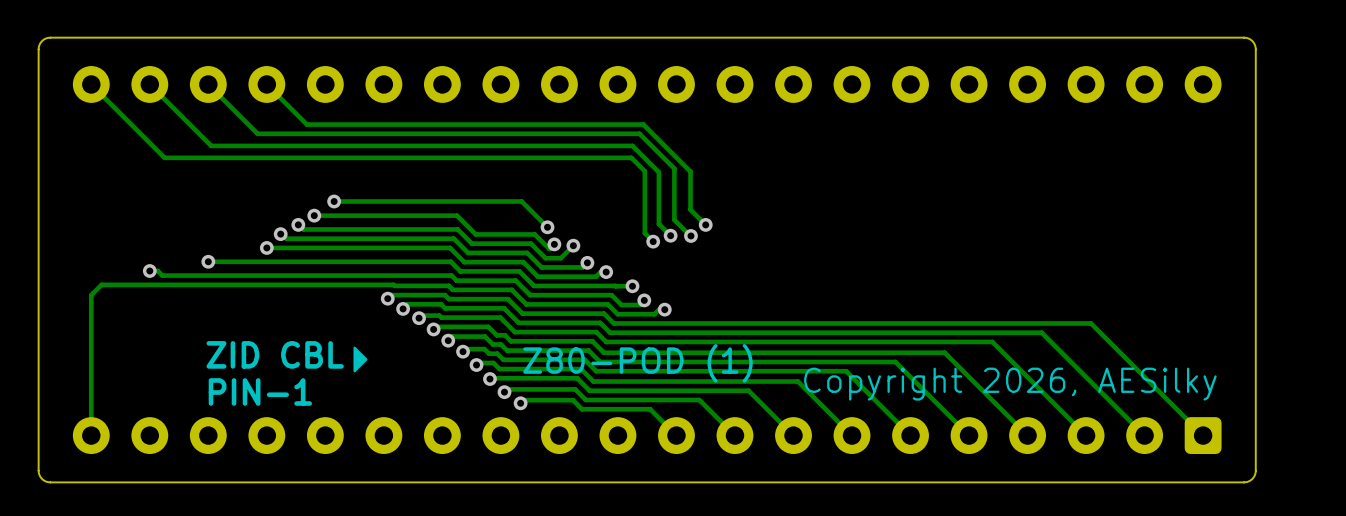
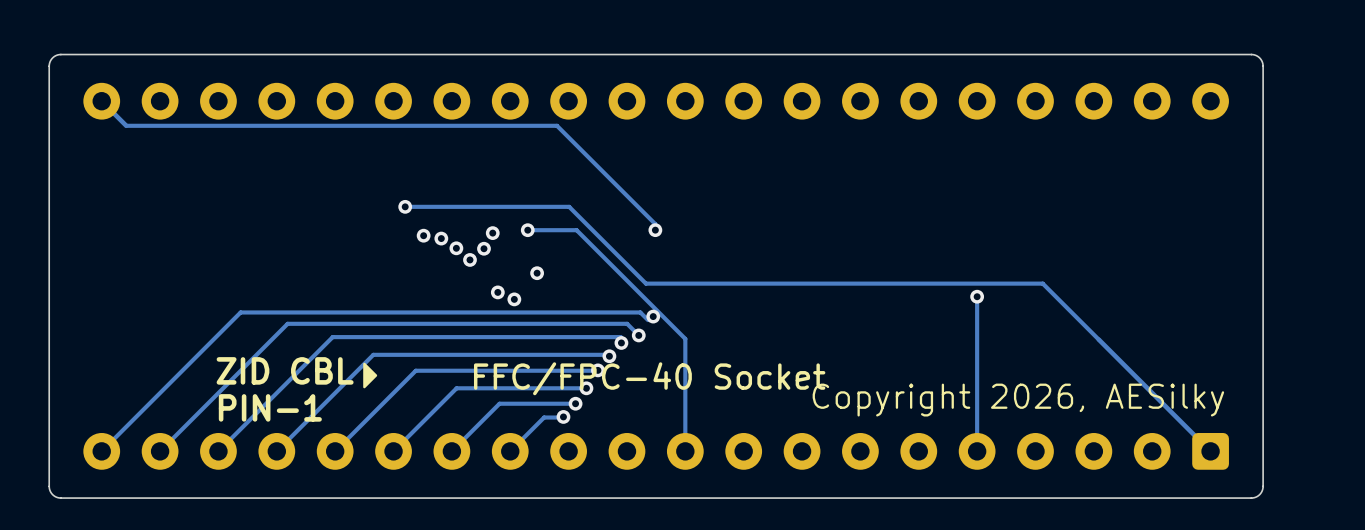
track: (149, 84) (211, 145) (632, 145) (658, 172) (658, 223) (670, 235) -> none
track: (208, 84) (257, 133) (639, 133) (674, 168) (674, 219) (690, 235) -> none
track: (266, 84) (306, 124) (643, 124) (690, 171) (690, 209) (705, 224) -> none
track: (115, 109) (164, 157) (631, 157) (644, 171) (644, 233) (653, 241) -> (126, 125) (557, 125) (655, 224) (655, 230)
via: none -> (405, 206)
track: (334, 201) (521, 201) (547, 227) -> none
via: (334, 201) -> none
via: none -> (527, 230)
via: none -> (655, 230)
track: (314, 215) (457, 215) (475, 234) (534, 234) (549, 248) -> none
via: (314, 215) -> none
via: none -> (492, 233)
via: none -> (423, 235)
via: none -> (441, 238)
track: (298, 224) (303, 229) (457, 229) (471, 243) (531, 243) (545, 258) (560, 258) (573, 245) -> none
via: (298, 224) -> none
via: (705, 224) -> none
via: (547, 227) -> none
via: none -> (456, 248)
via: none -> (483, 248)
track: (280, 234) (286, 238) (453, 238) (468, 252) (527, 252) (541, 267) (582, 267) (587, 262) -> none
via: (280, 234) -> none
via: (670, 235) -> none
via: (690, 235) -> none
via: (653, 241) -> none
via: none -> (469, 259)
via: (554, 244) -> none
via: (573, 245) -> none
track: (266, 247) (450, 247) (464, 262) (523, 262) (537, 276) (596, 276) (600, 272) (606, 272) -> none
via: (266, 247) -> none
via: none -> (537, 273)
track: (208, 261) (450, 261) (460, 271) (519, 271) (534, 285) (632, 286) -> none
via: (208, 261) -> none
via: (587, 262) -> none
track: (149, 271) (157, 271) (162, 275) (451, 275) (456, 280) (515, 280) (530, 295) (611, 295) (621, 304) (640, 304) (644, 300) -> none
via: (149, 271) -> none
via: (606, 272) -> none
via: none -> (497, 292)
via: none -> (977, 296)
via: none -> (514, 299)
via: (632, 286) -> none
track: (387, 298) (391, 295) (444, 295) (449, 299) (508, 299) (522, 313) (604, 313) (613, 323) (1091, 323) -> (405, 206) (569, 206) (645, 283) (1042, 283) (1098, 339)
via: (387, 298) -> none
track: (403, 308) (407, 304) (441, 304) (445, 308) (504, 308) (518, 322) (600, 322) (610, 332) (1041, 332) (1144, 435) -> none
via: (403, 308) -> none
track: (664, 309) (659, 309) (654, 314) (617, 314) (607, 304) (526, 304) (511, 289) (452, 289) (448, 285) (101, 284) (91, 295) (91, 435) -> (647, 320) (640, 312) (240, 312) (101, 451)
via: (664, 309) -> none
track: (419, 318) (421, 315) (439, 315) (441, 317) (500, 317) (514, 332) (596, 332) (606, 341) (992, 341) (1086, 435) -> none
via: (419, 318) -> none
track: none -> (638, 335) (627, 323) (287, 323) (160, 451)
via: none -> (638, 335)
track: none -> (621, 342) (620, 337) (332, 337) (218, 451)
via: none -> (621, 342)
track: (433, 329) (436, 326) (488, 326) (496, 335) (504, 335) (511, 341) (592, 341) (603, 352) (944, 352) (1027, 435) -> none
via: (433, 329) -> none
track: (448, 340) (452, 336) (485, 336) (492, 344) (501, 344) (507, 350) (588, 350) (600, 361) (895, 361) (969, 435) -> (977, 296) (977, 451)
via: (448, 340) -> none
track: none -> (609, 356) (373, 354) (276, 451)
via: none -> (609, 356)
track: (463, 351) (466, 349) (484, 349) (489, 353) (497, 353) (503, 359) (584, 359) (596, 371) (846, 371) (910, 435) -> none
via: (463, 351) -> none
track: none -> (597, 370) (415, 370) (335, 451)
via: none -> (597, 370)
part value: Z80-POD (1) (637, 363) -> FFC/FPC-40 Socket (649, 378)
track: (476, 365) (478, 362) (493, 362) (499, 369) (581, 369) (593, 381) (797, 381) (852, 435) -> none
via: (476, 365) -> none
track: none -> (586, 388) (456, 388) (393, 451)
via: none -> (586, 388)
track: (489, 379) (577, 378) (589, 390) (748, 390) (793, 435) -> none
via: (489, 379) -> none
track: none -> (575, 403) (499, 403) (451, 451)
via: none -> (575, 403)
track: (504, 392) (507, 389) (575, 389) (585, 400) (699, 400) (734, 435) -> none
via: (504, 392) -> none
track: none -> (563, 416) (544, 417) (510, 451)
via: none -> (563, 416)
track: (520, 403) (523, 400) (573, 400) (582, 409) (650, 409) (676, 435) -> (527, 230) (576, 230) (685, 338) (685, 451)
via: (520, 403) -> none

